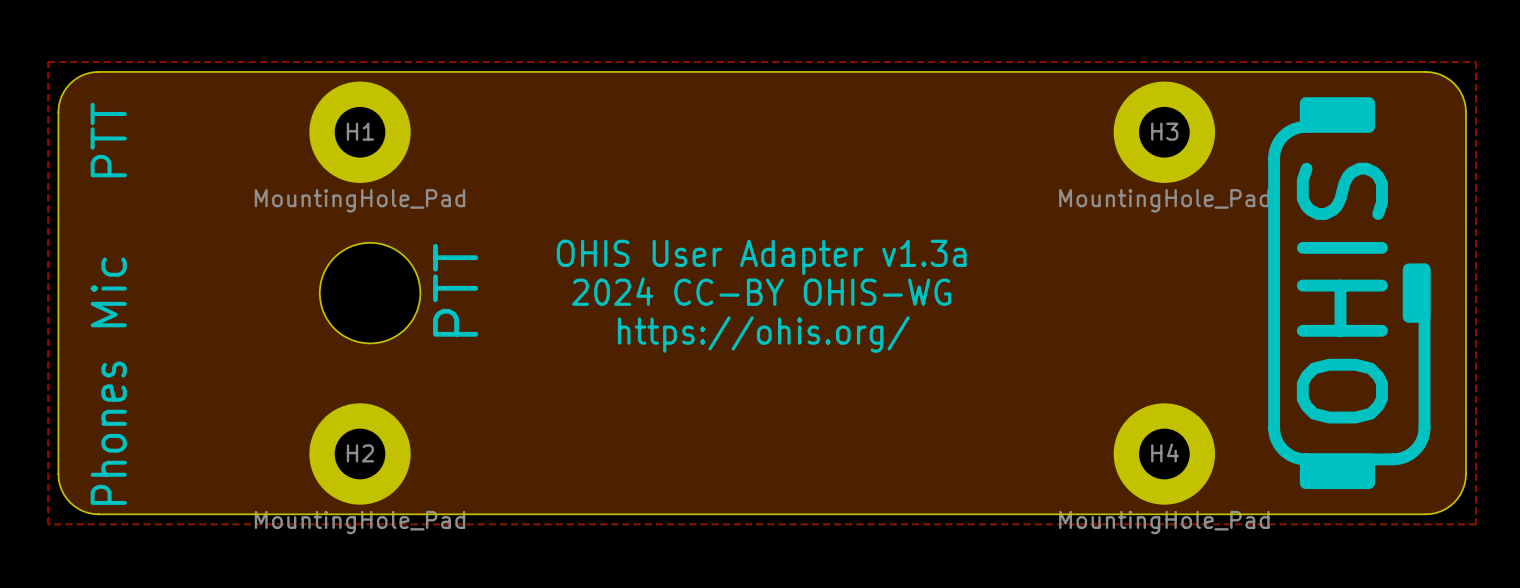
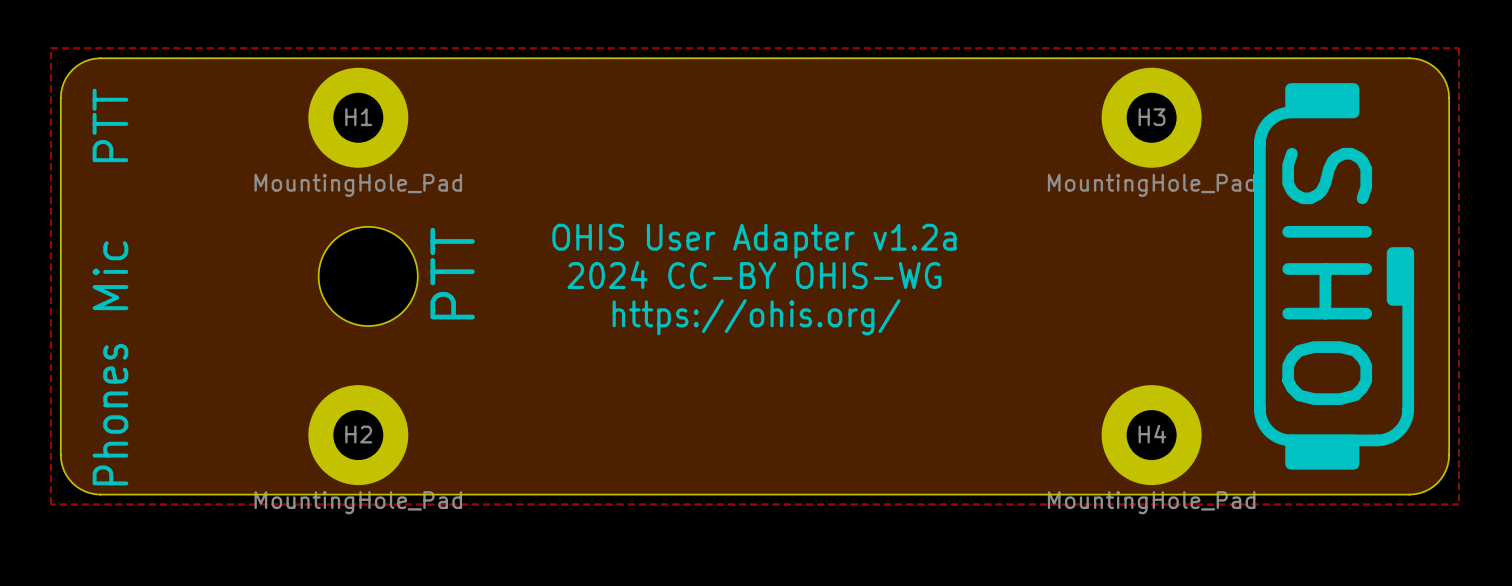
text: OHIS User Adapter v1.3a (761, 257) -> OHIS User Adapter v1.2a (754, 241)

